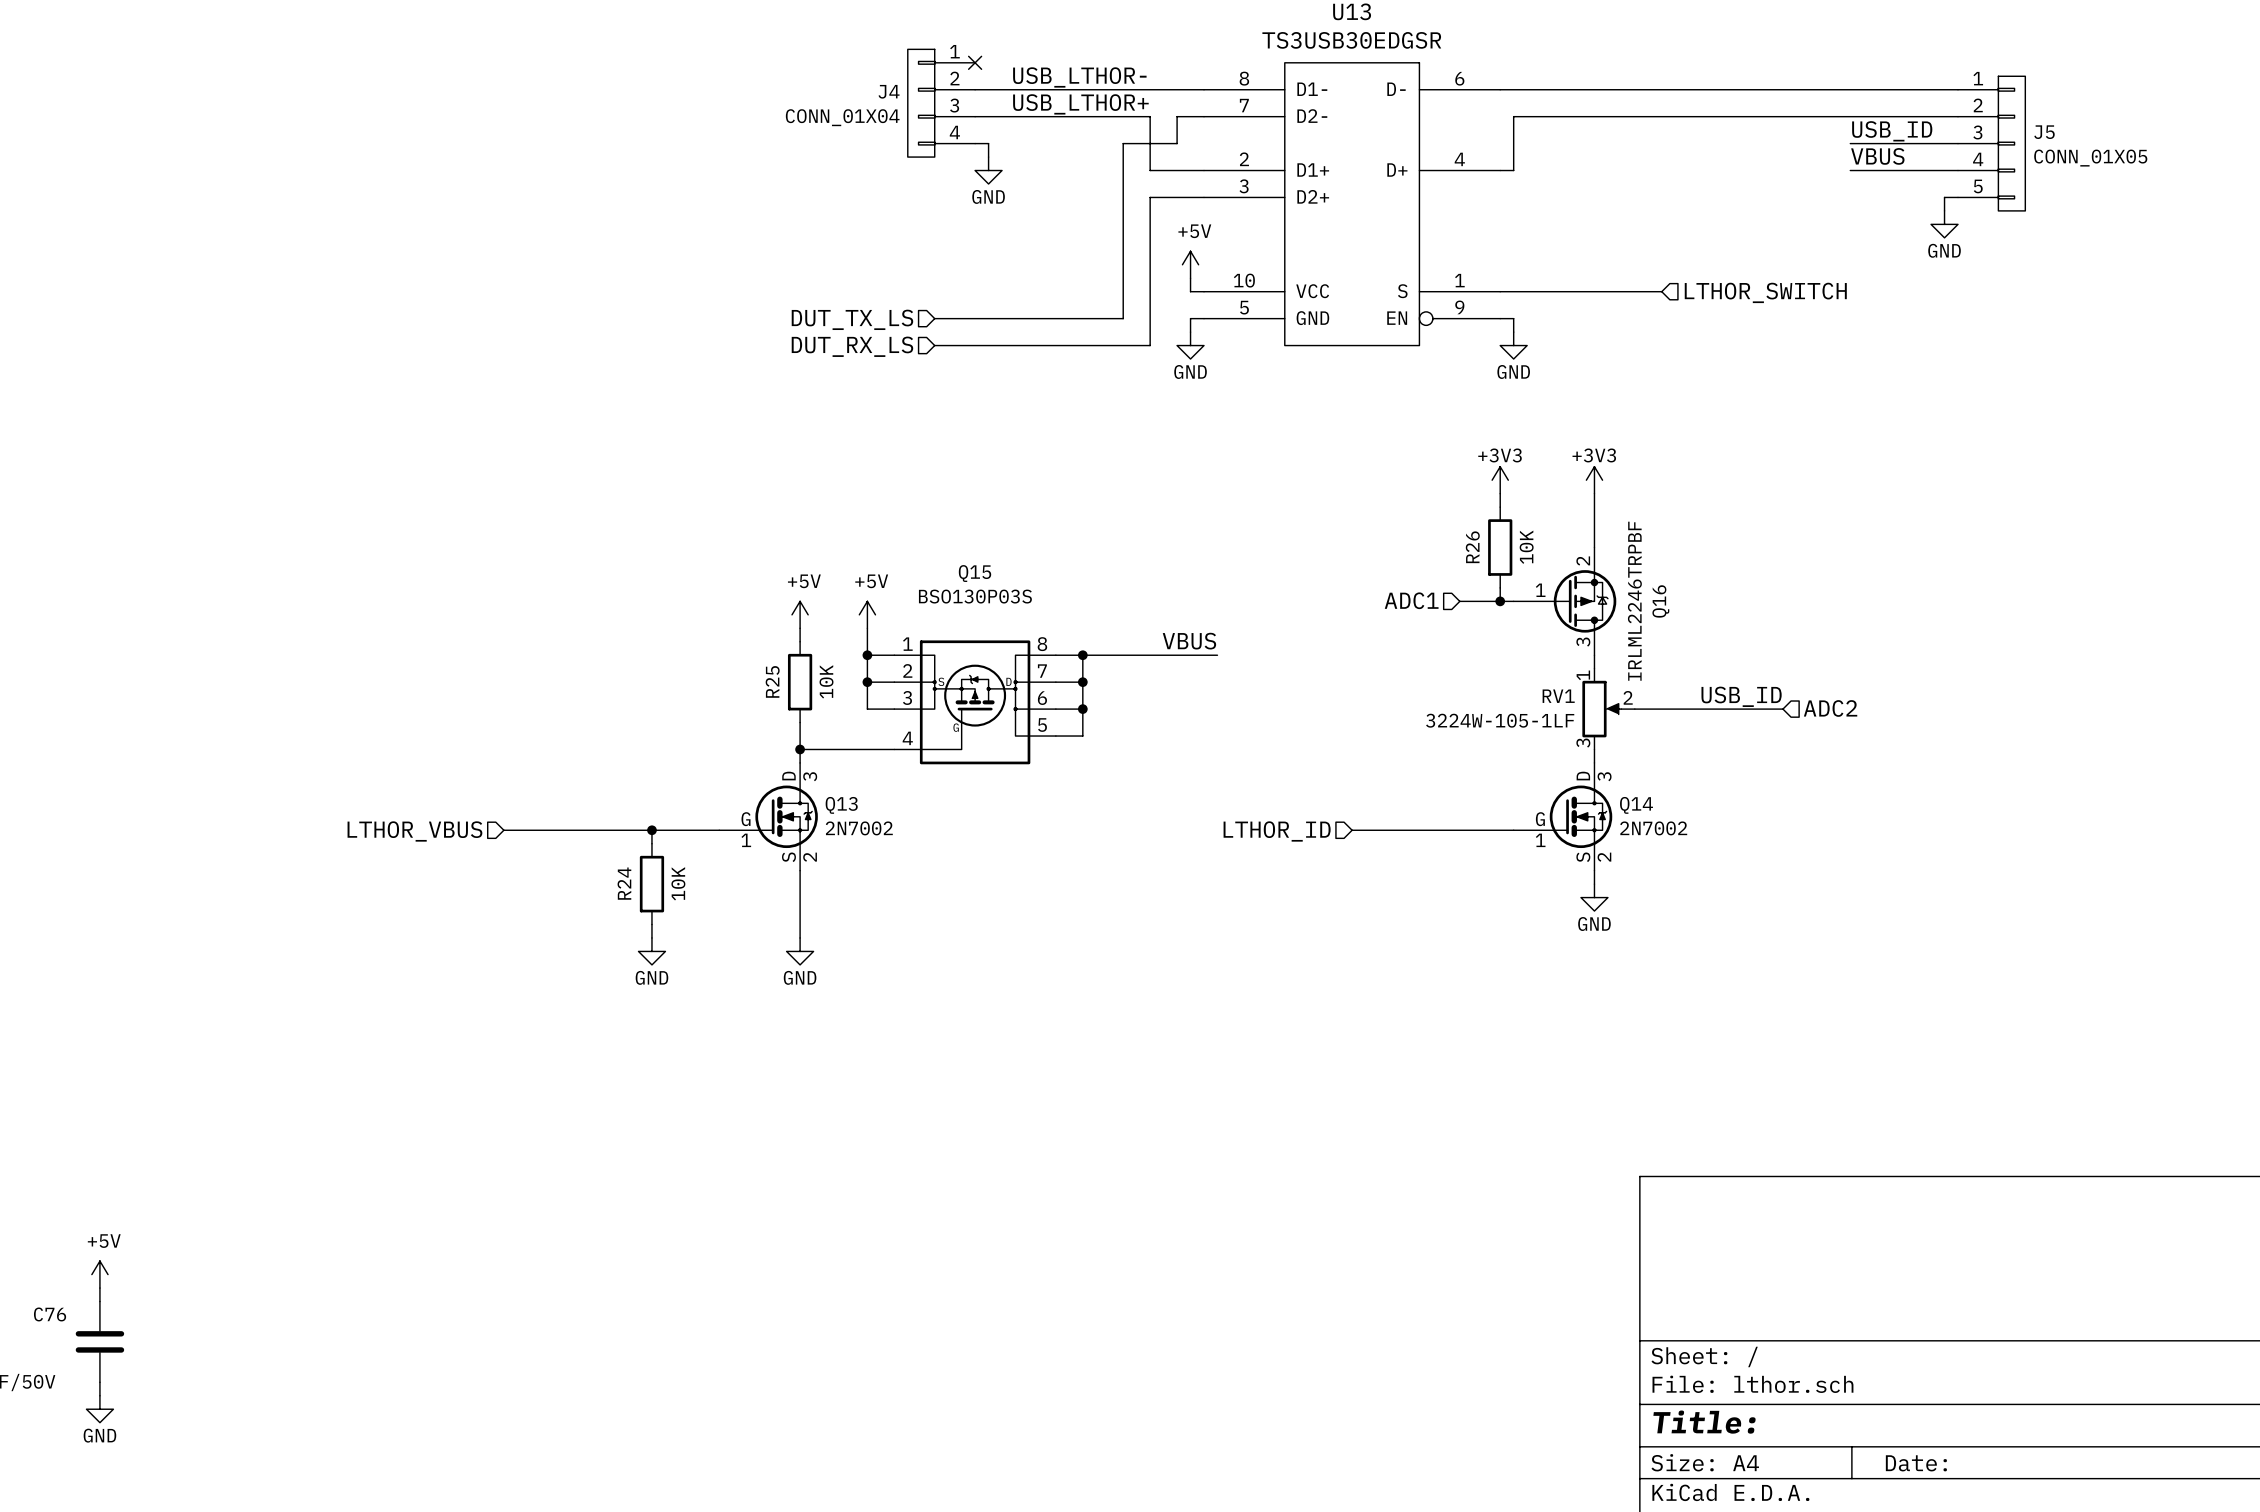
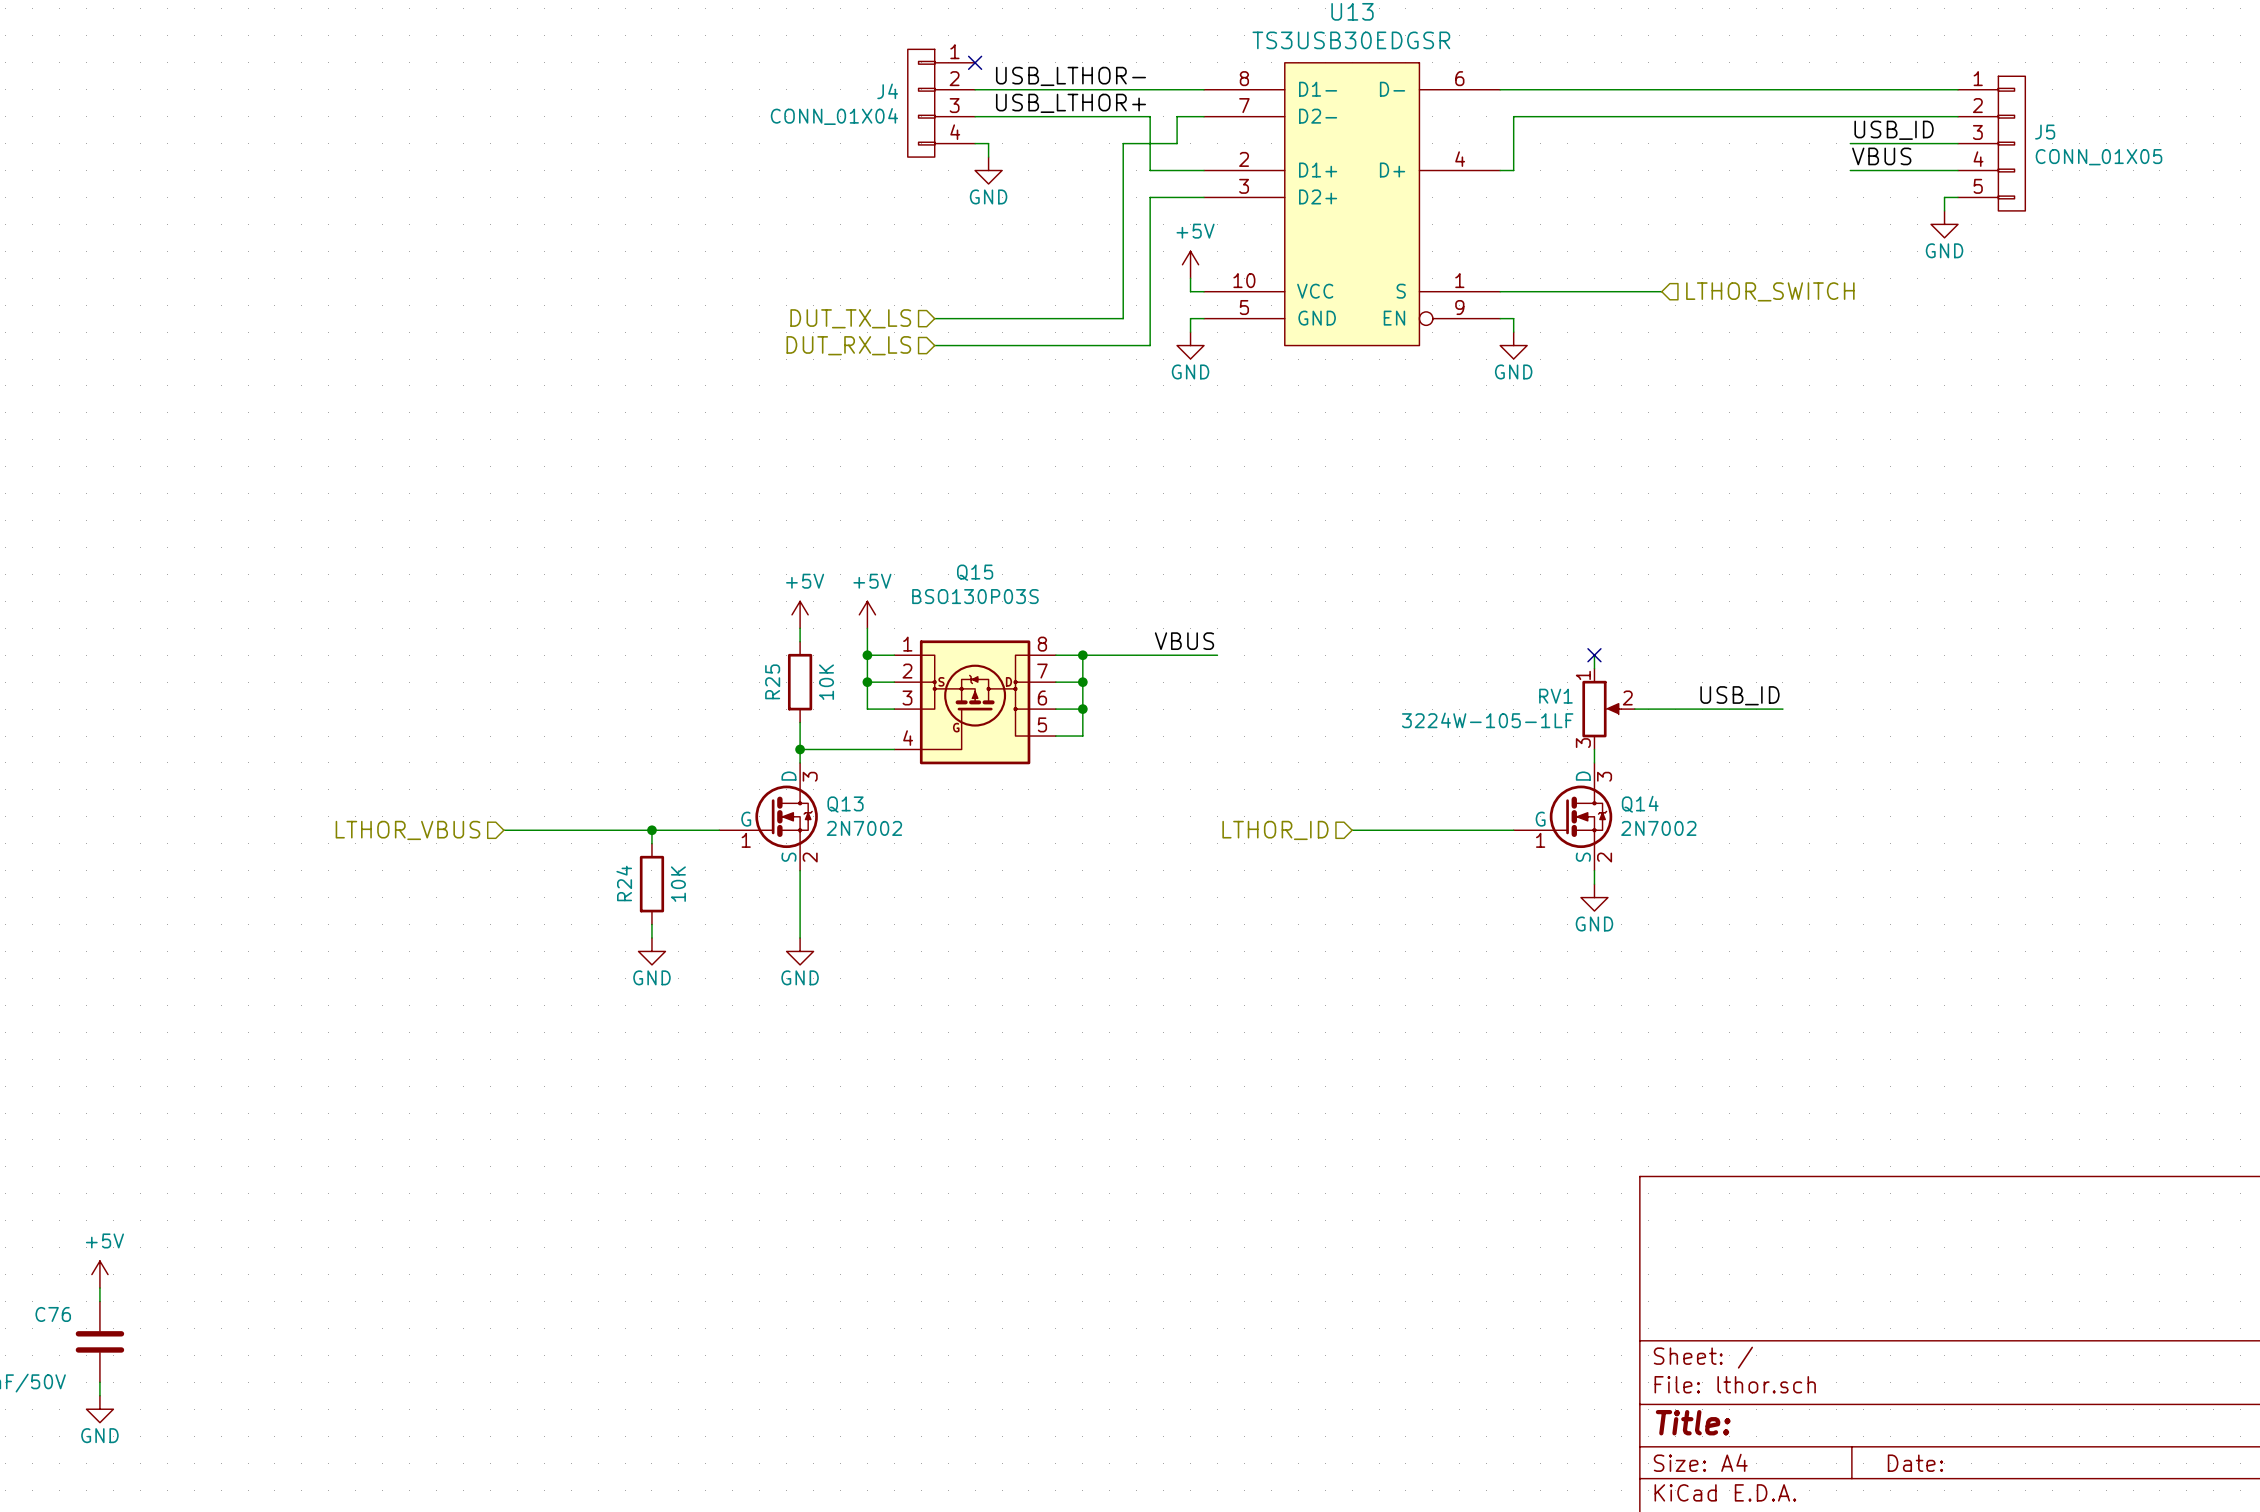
power symbol: +3V3 (1500, 480) -> none
power symbol: +3V3 (1594, 480) -> none
wire: (1500, 493) (1500, 507) -> none
wire: (1594, 493) (1594, 547) -> none
R26: 10K (1500, 547) -> none
wire: (1500, 587) (1500, 601) -> none
hierarchical label: ADC1 (1411, 600) -> none
wire: (1459, 601) (1513, 601) -> none
junction: (1500, 601) -> none
Q16: IRLML2246TRPBF (1564, 601) -> none
no-connect mark: none -> (1594, 655)
hierarchical label: ADC2 (1830, 708) -> none

